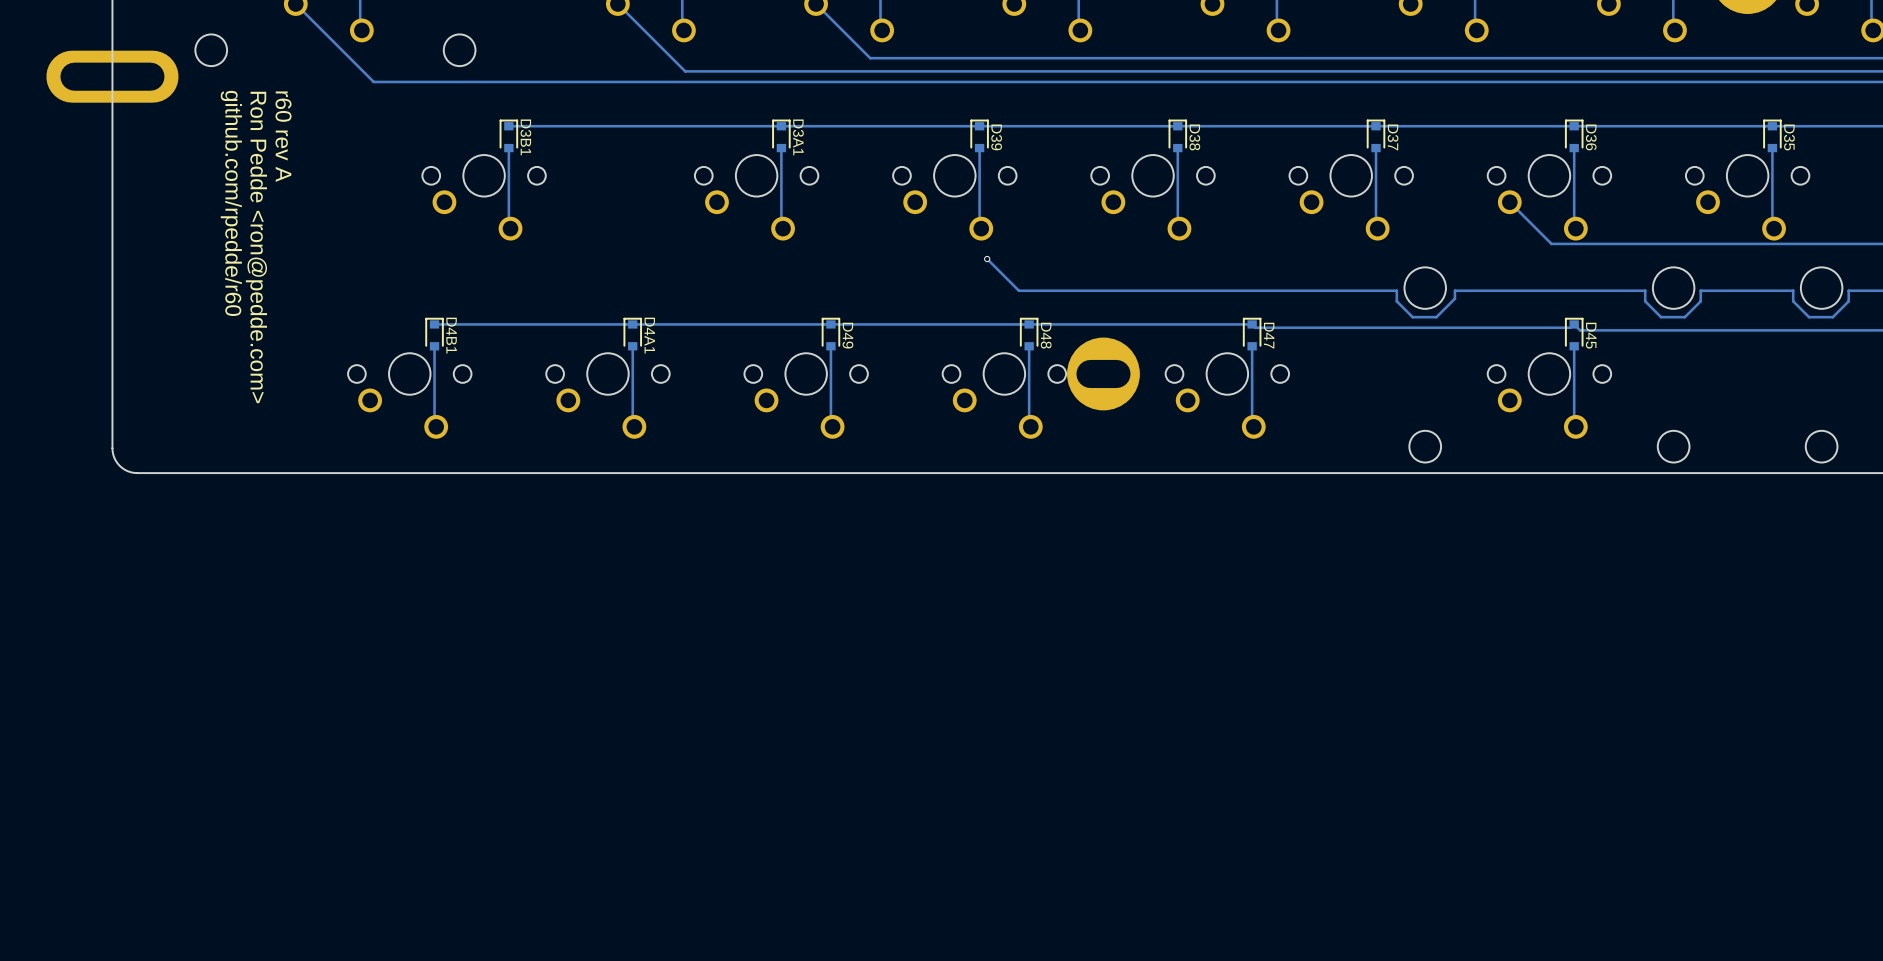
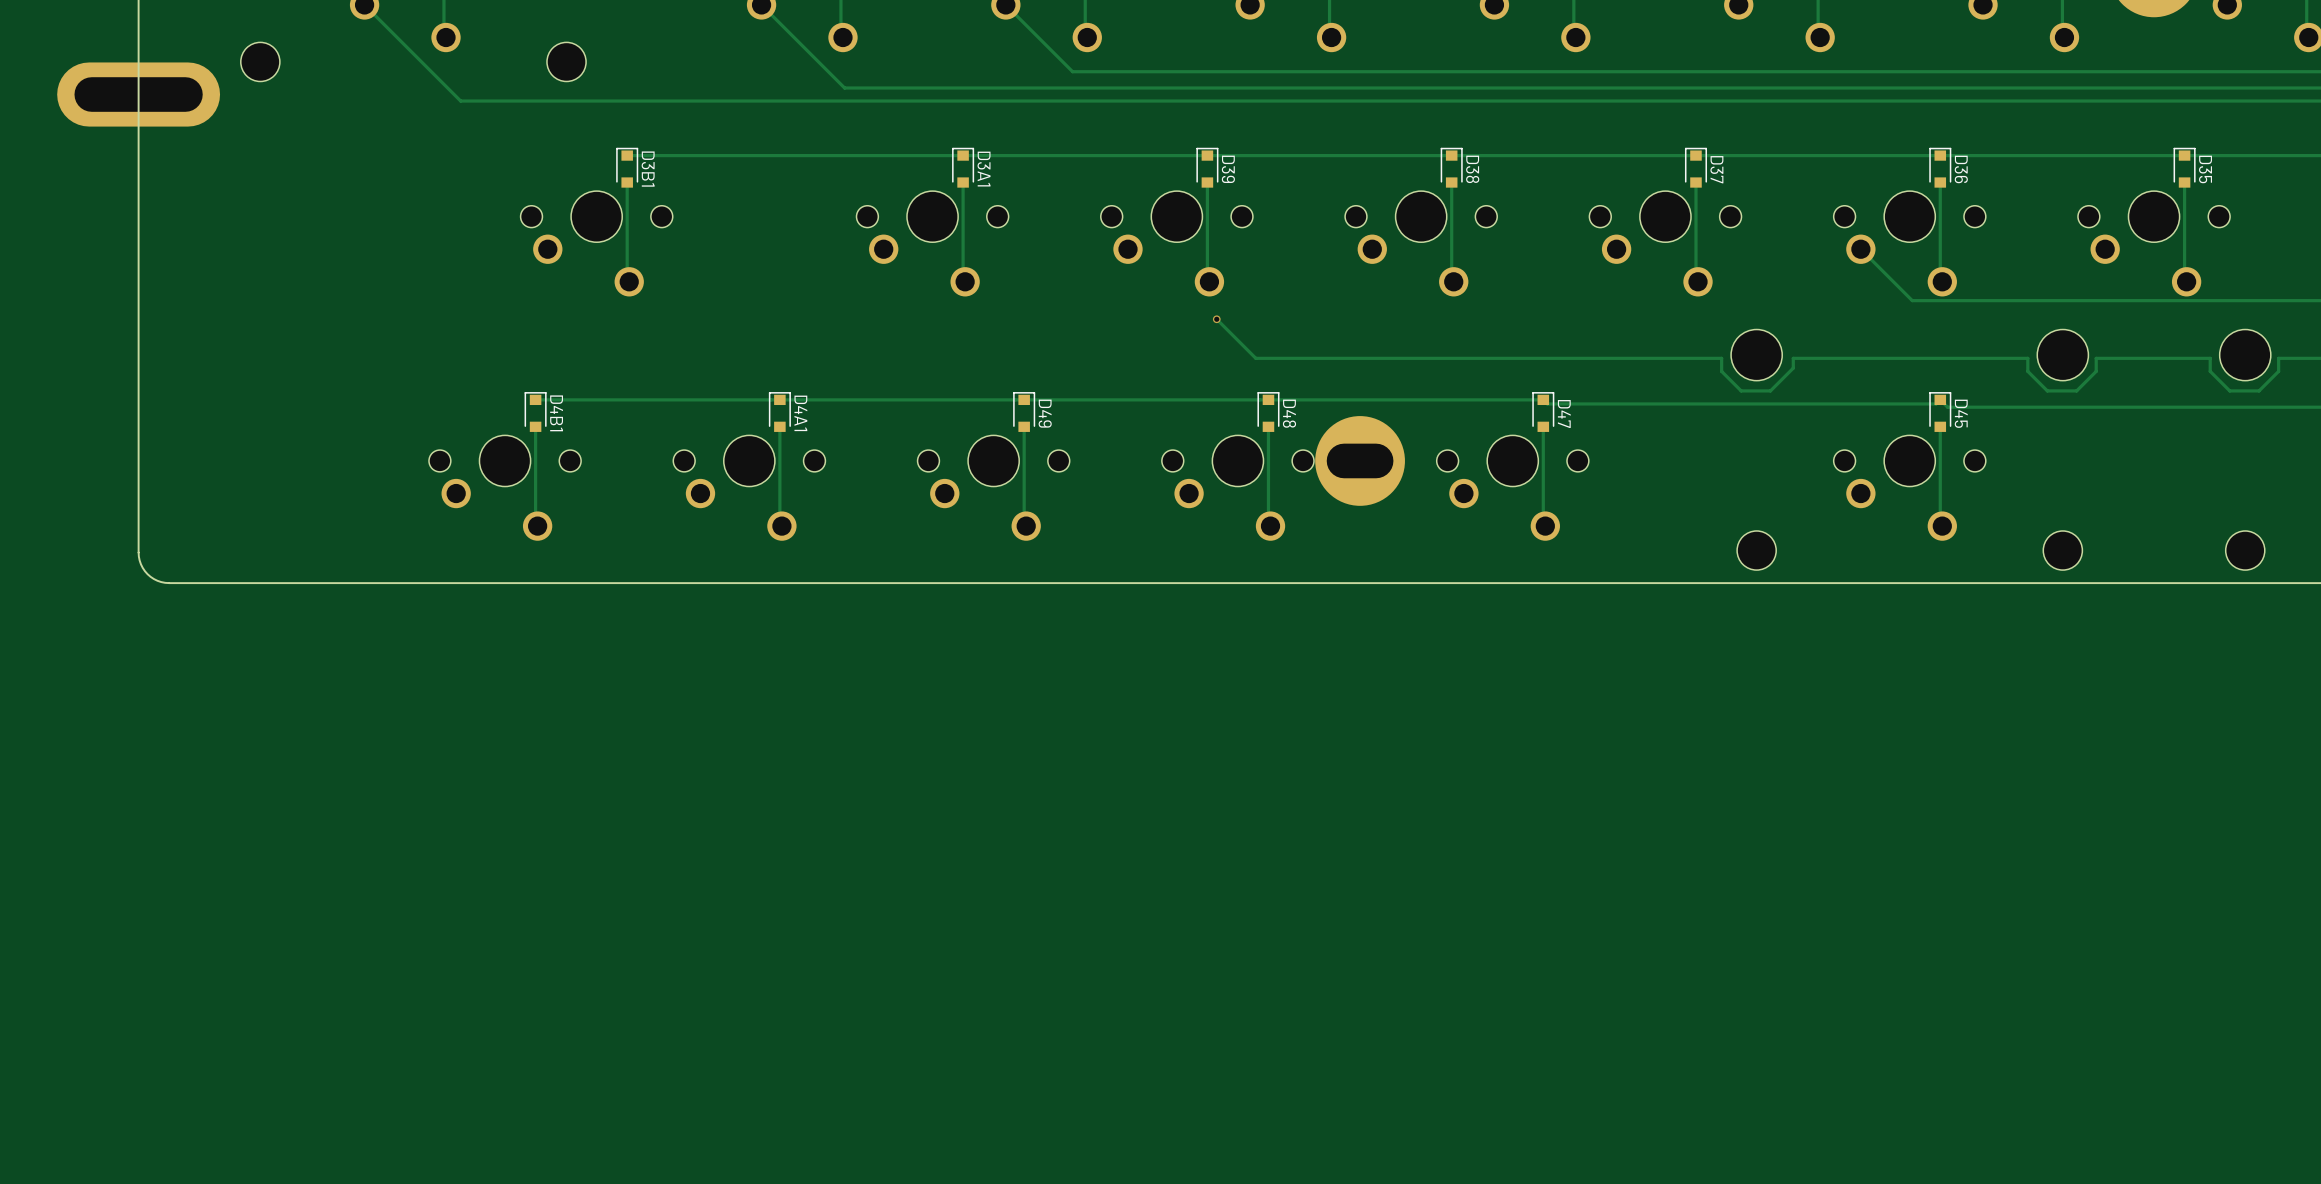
text: r60 rev A (283, 136) -> none
text: github.com/rpedde/r60 (231, 203) -> none
text: Ron Pedde <ron@pedde.com> (256, 247) -> none

